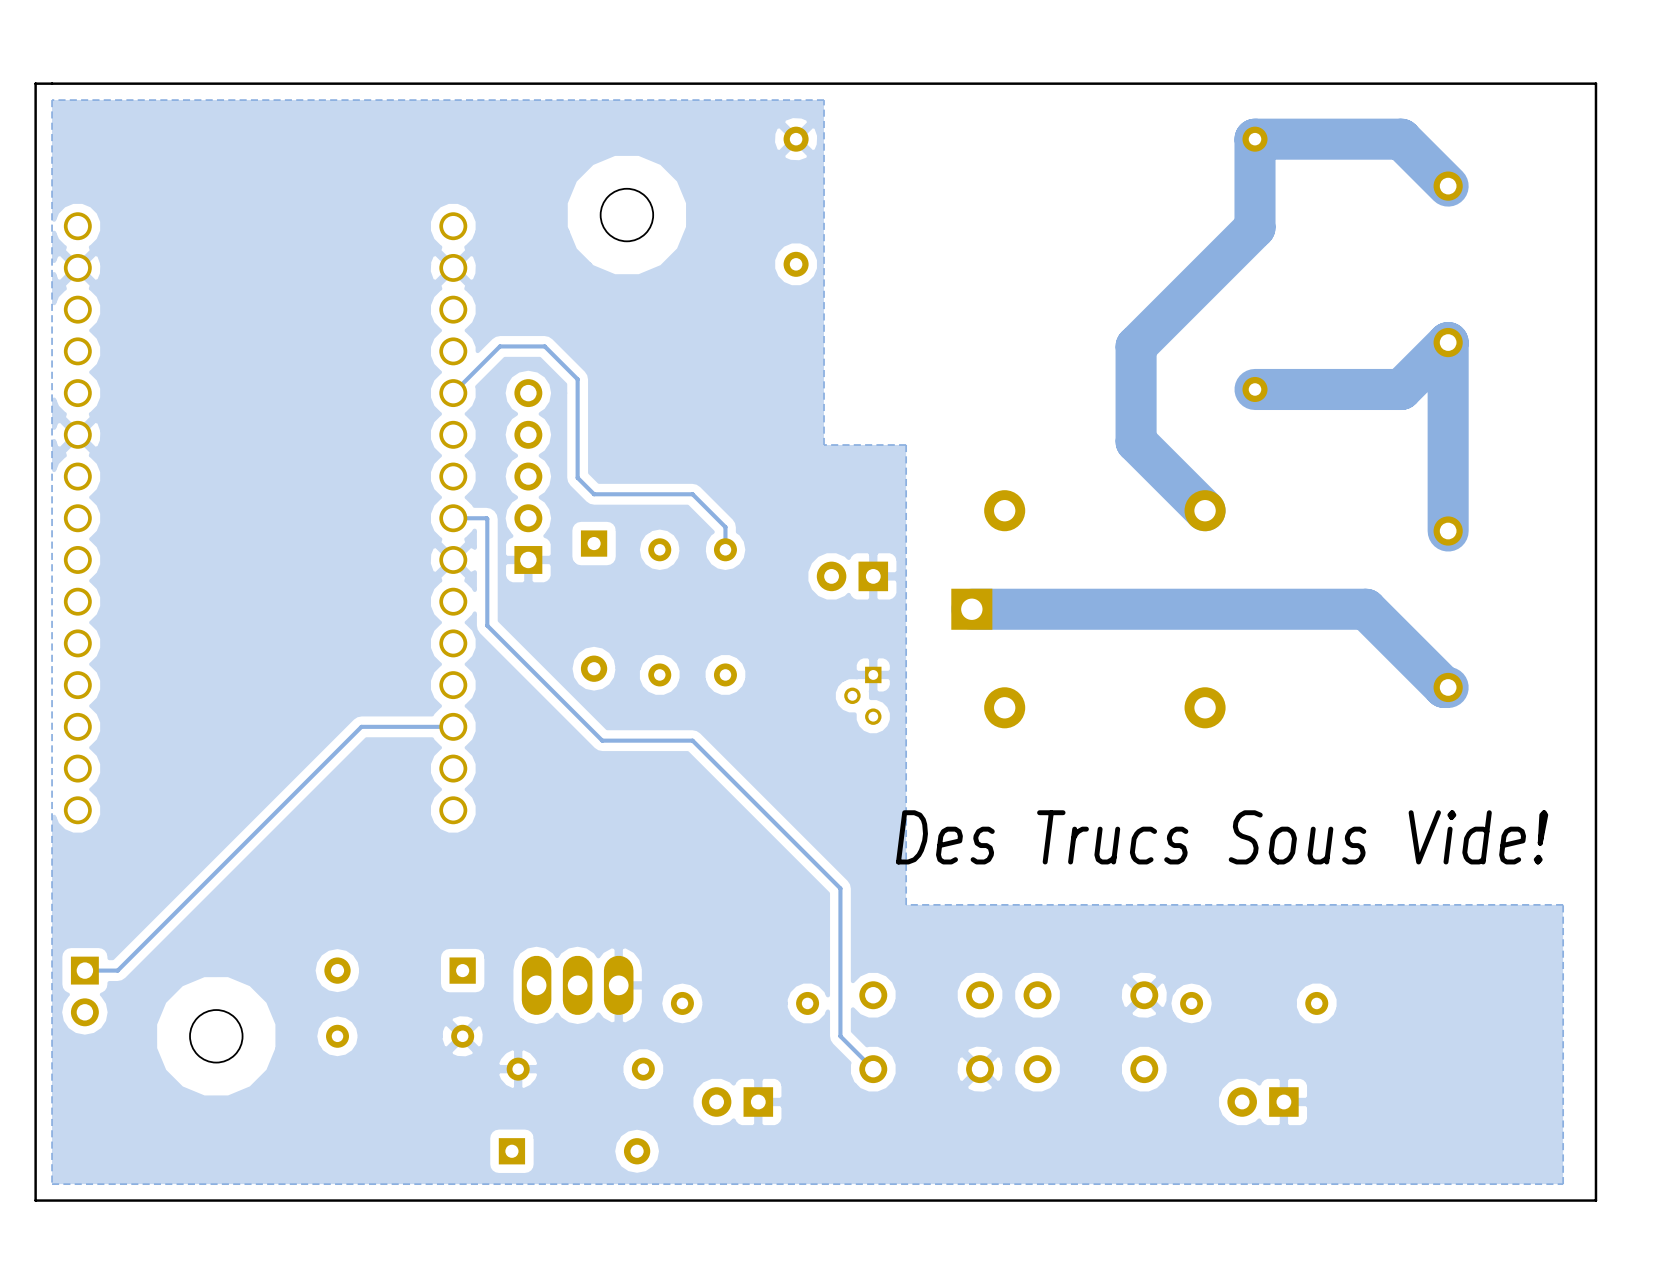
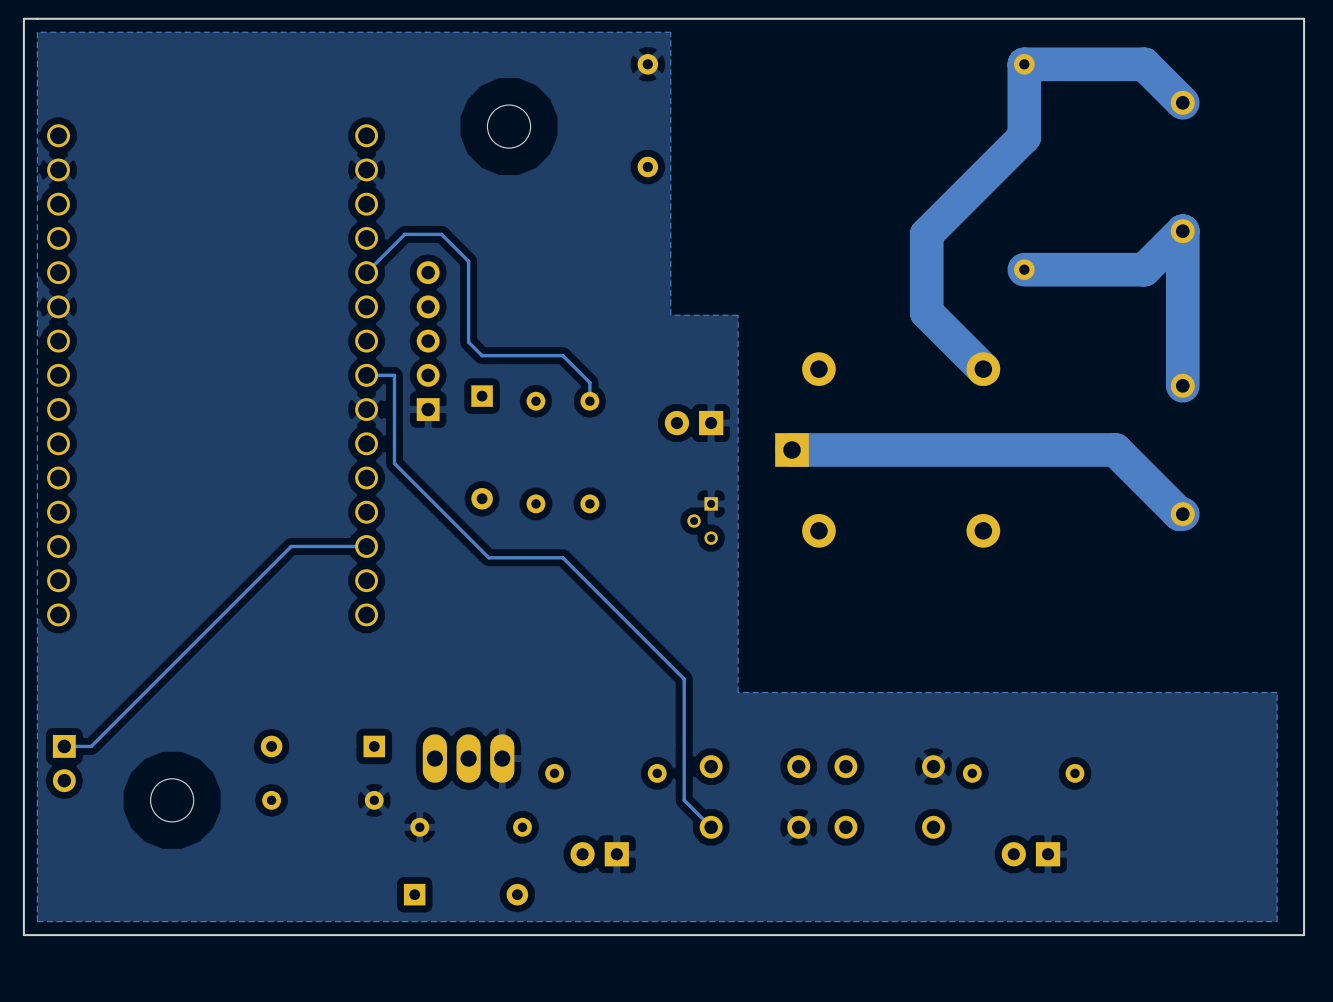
text: Des Trucs Sous Vide! (1222, 837) -> none

